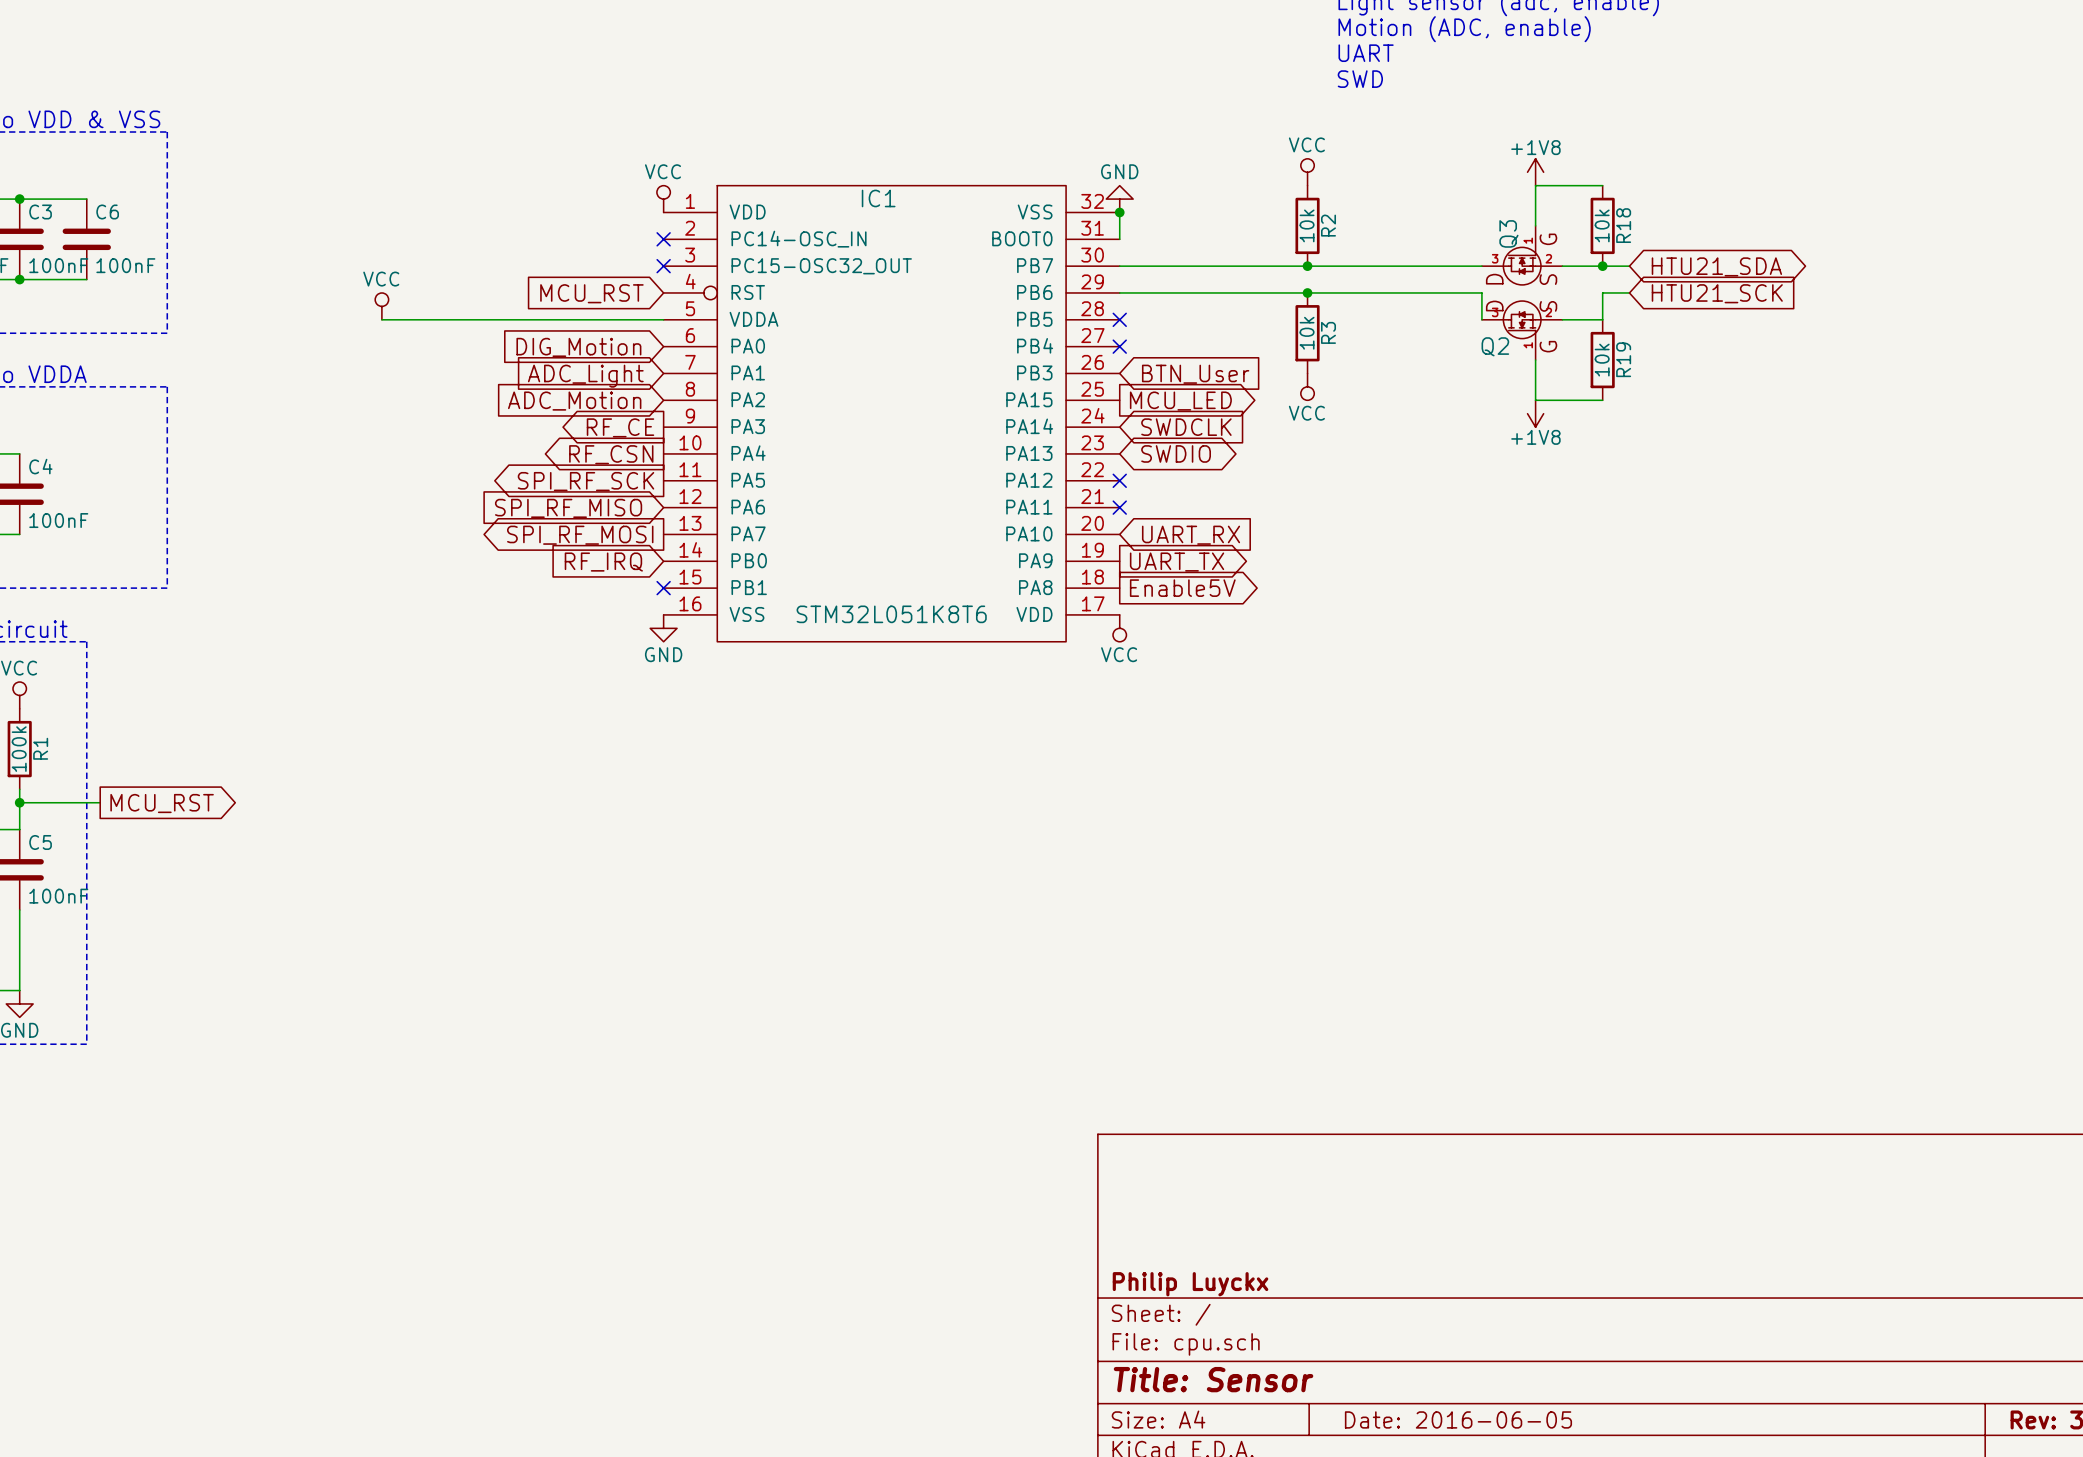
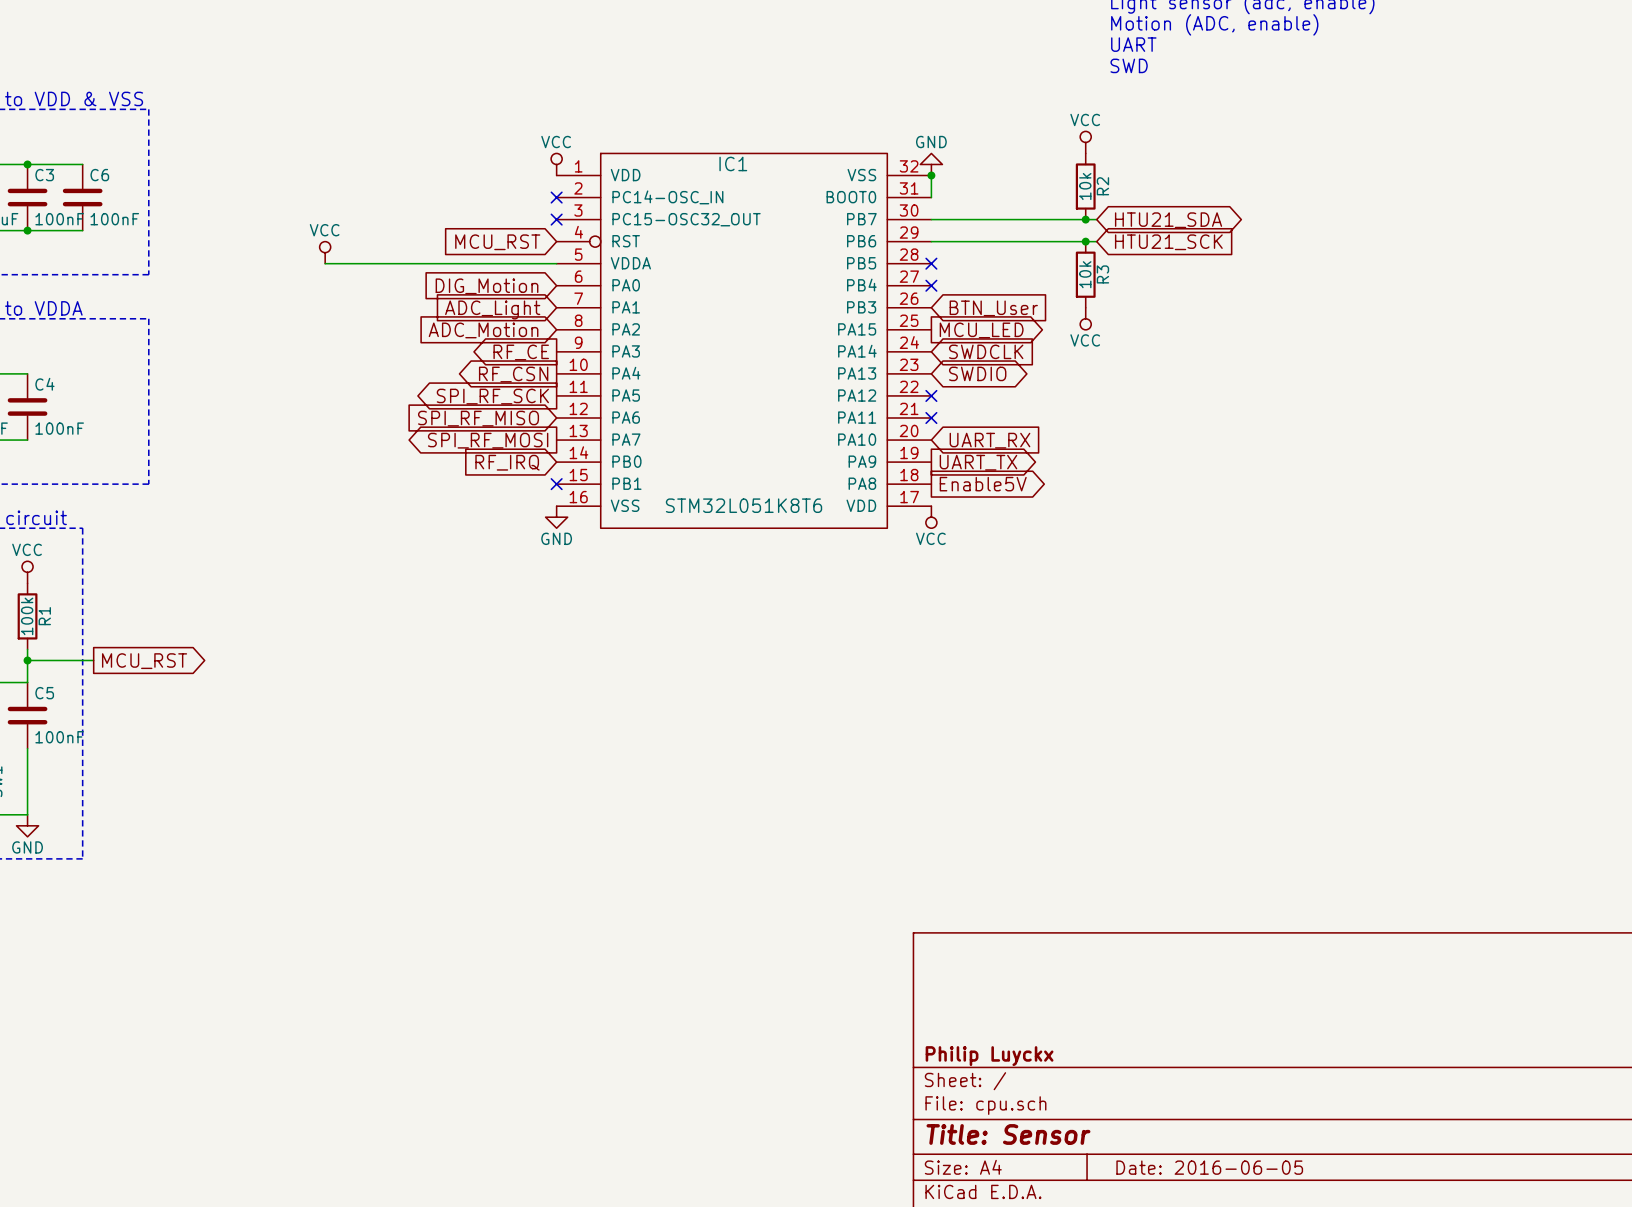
power symbol: +1V8 (1535, 172) -> none
wire: (1602, 185) (1535, 185) (1535, 225) -> none
R18: 10k (1602, 225) -> none
Q2: (1522, 255) -> none
wire: (1320, 266) (1481, 266) -> none
global label: none -> HTU21_SDA (1168, 220)
wire: (1562, 266) (1629, 266) -> none
junction: (1602, 266) -> none
global label: HTU21_SDA (1716, 266) -> none
wire: (1320, 292) (1481, 292) (1481, 319) -> none
wire: (1629, 292) (1602, 292) (1602, 319) (1562, 319) -> none
global label: none -> HTU21_SCK (1168, 242)
global label: HTU21_SCK (1717, 293) -> none
Q3: (1522, 330) -> none
wire: (1535, 360) (1535, 400) (1602, 400) -> none
R19: 10k (1602, 360) -> none
power symbol: +1V8 (1535, 413) -> none

